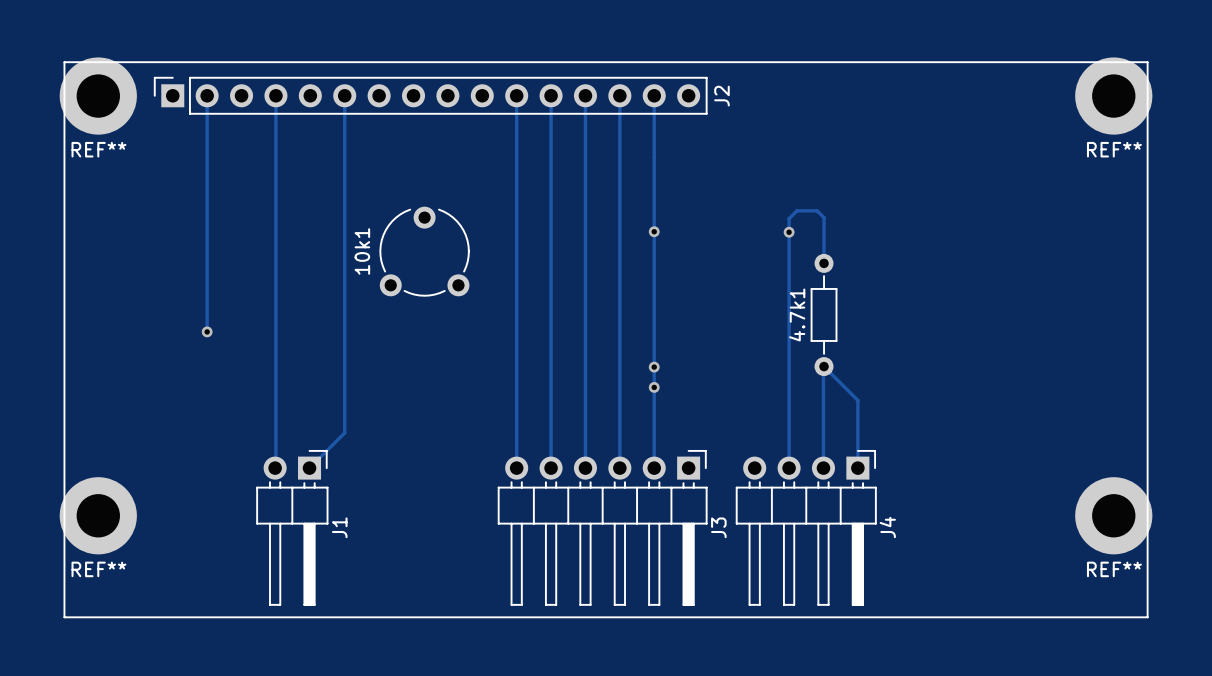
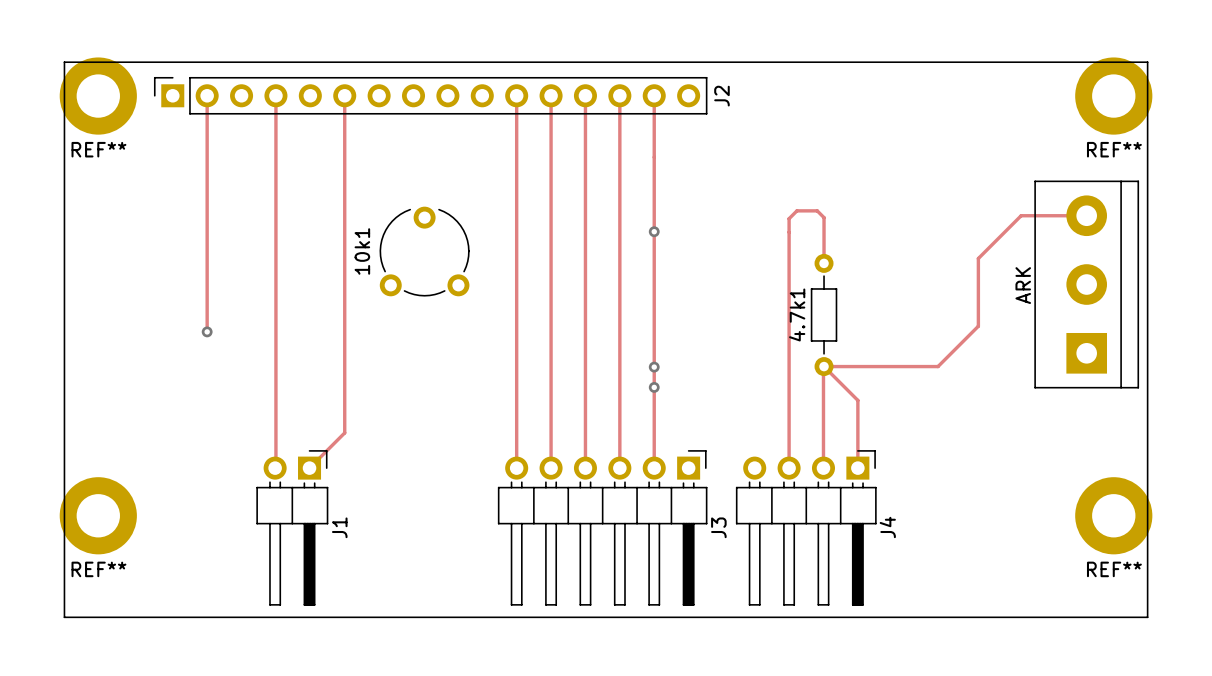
track: none -> (1086, 215) (1021, 215) (978, 258) (978, 326) (938, 366) (824, 366)
via: (789, 232) -> none
ARK: none -> (1086, 284)

